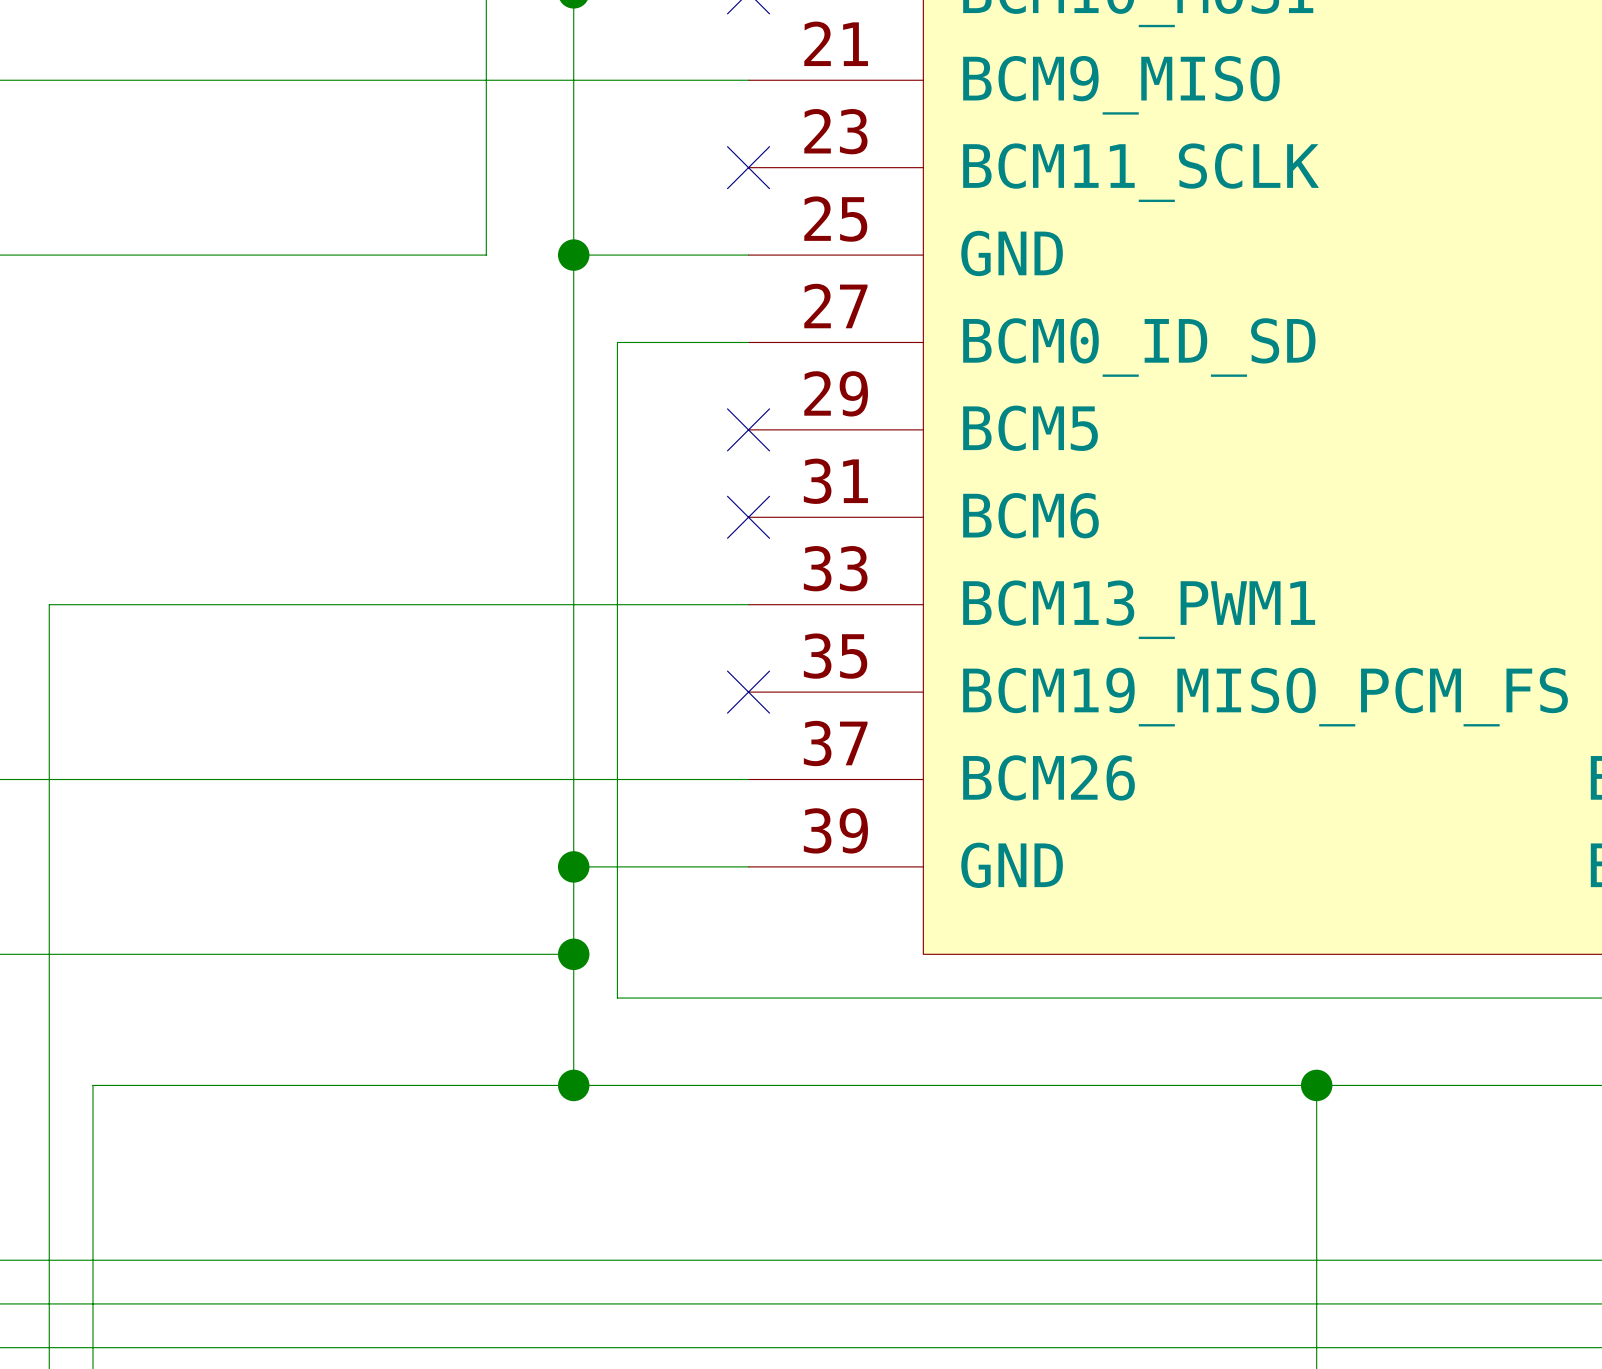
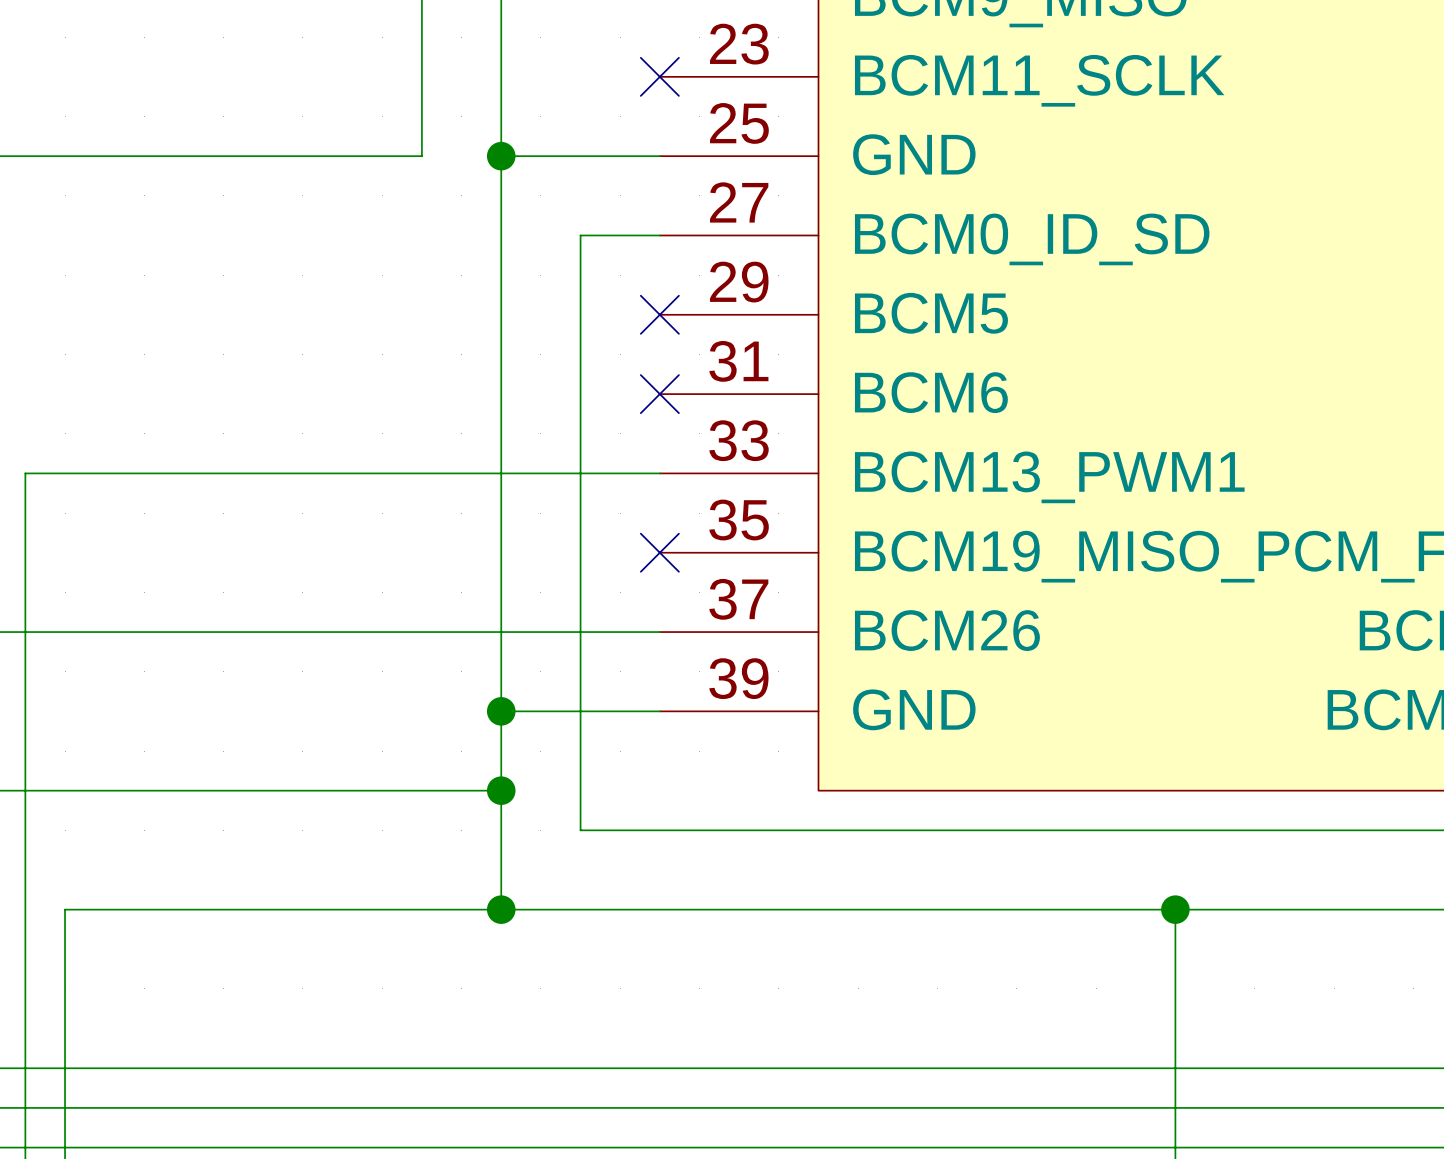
wire: (661, 342) (617, 342) (617, 998) (661, 998) -> (580, 235) (580, 830)

